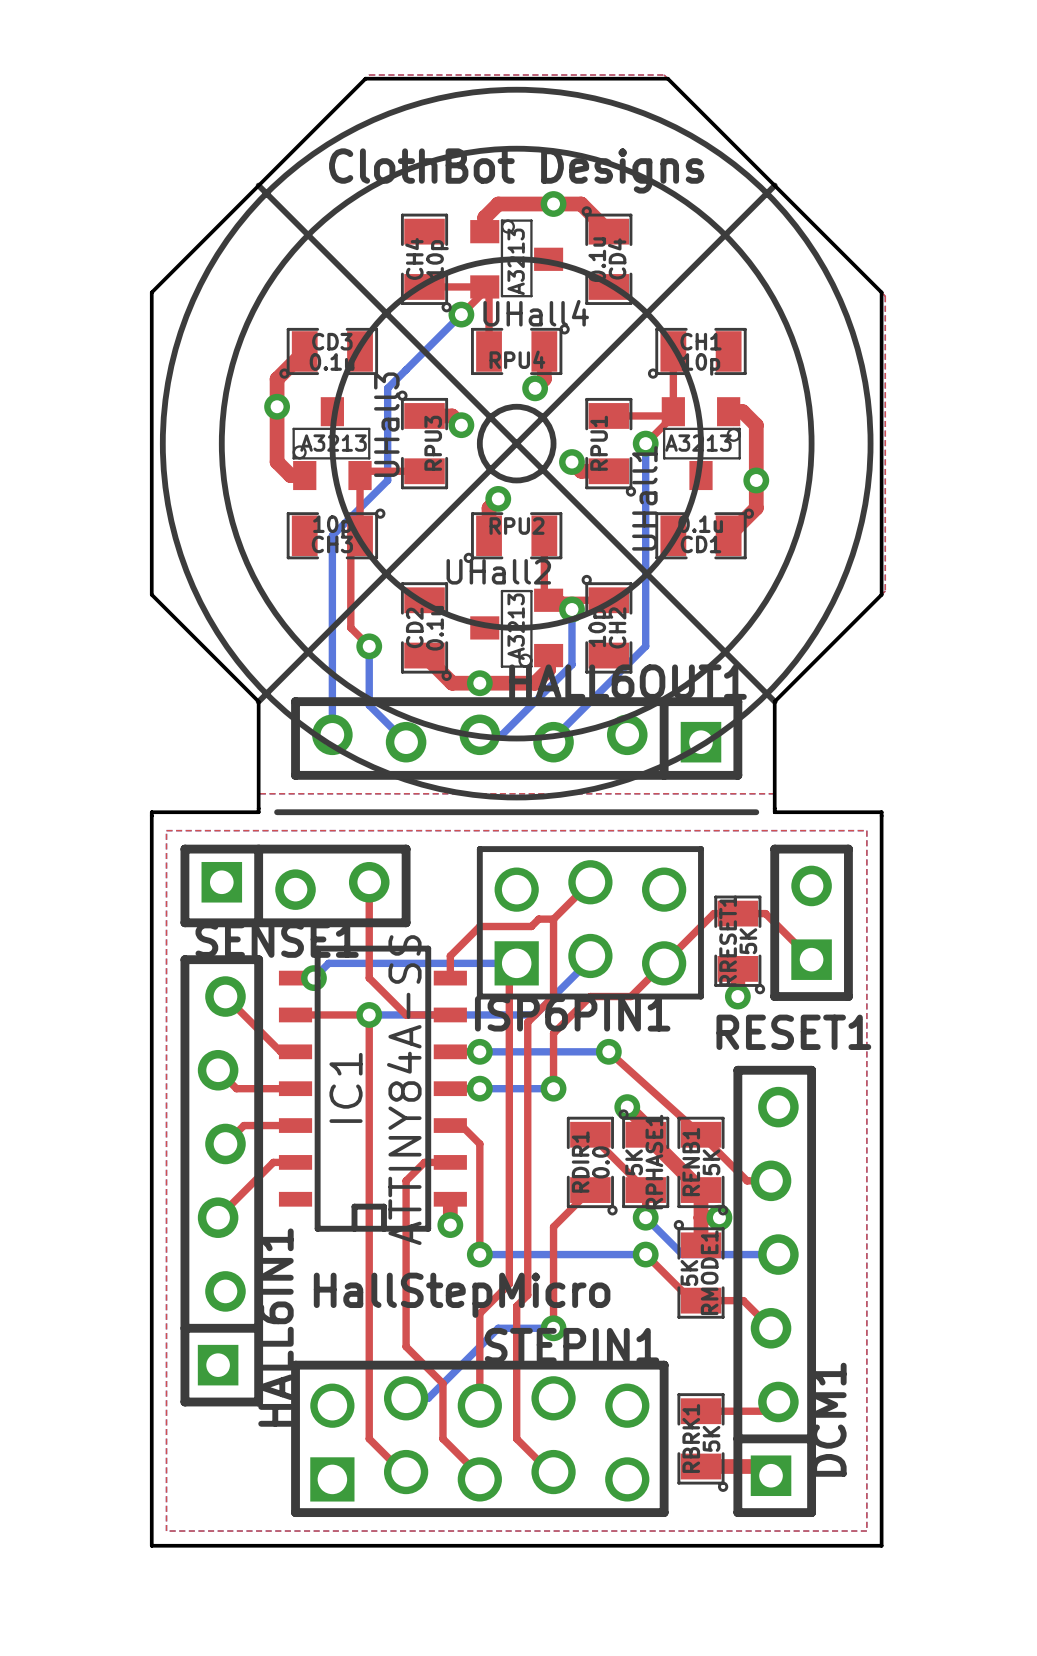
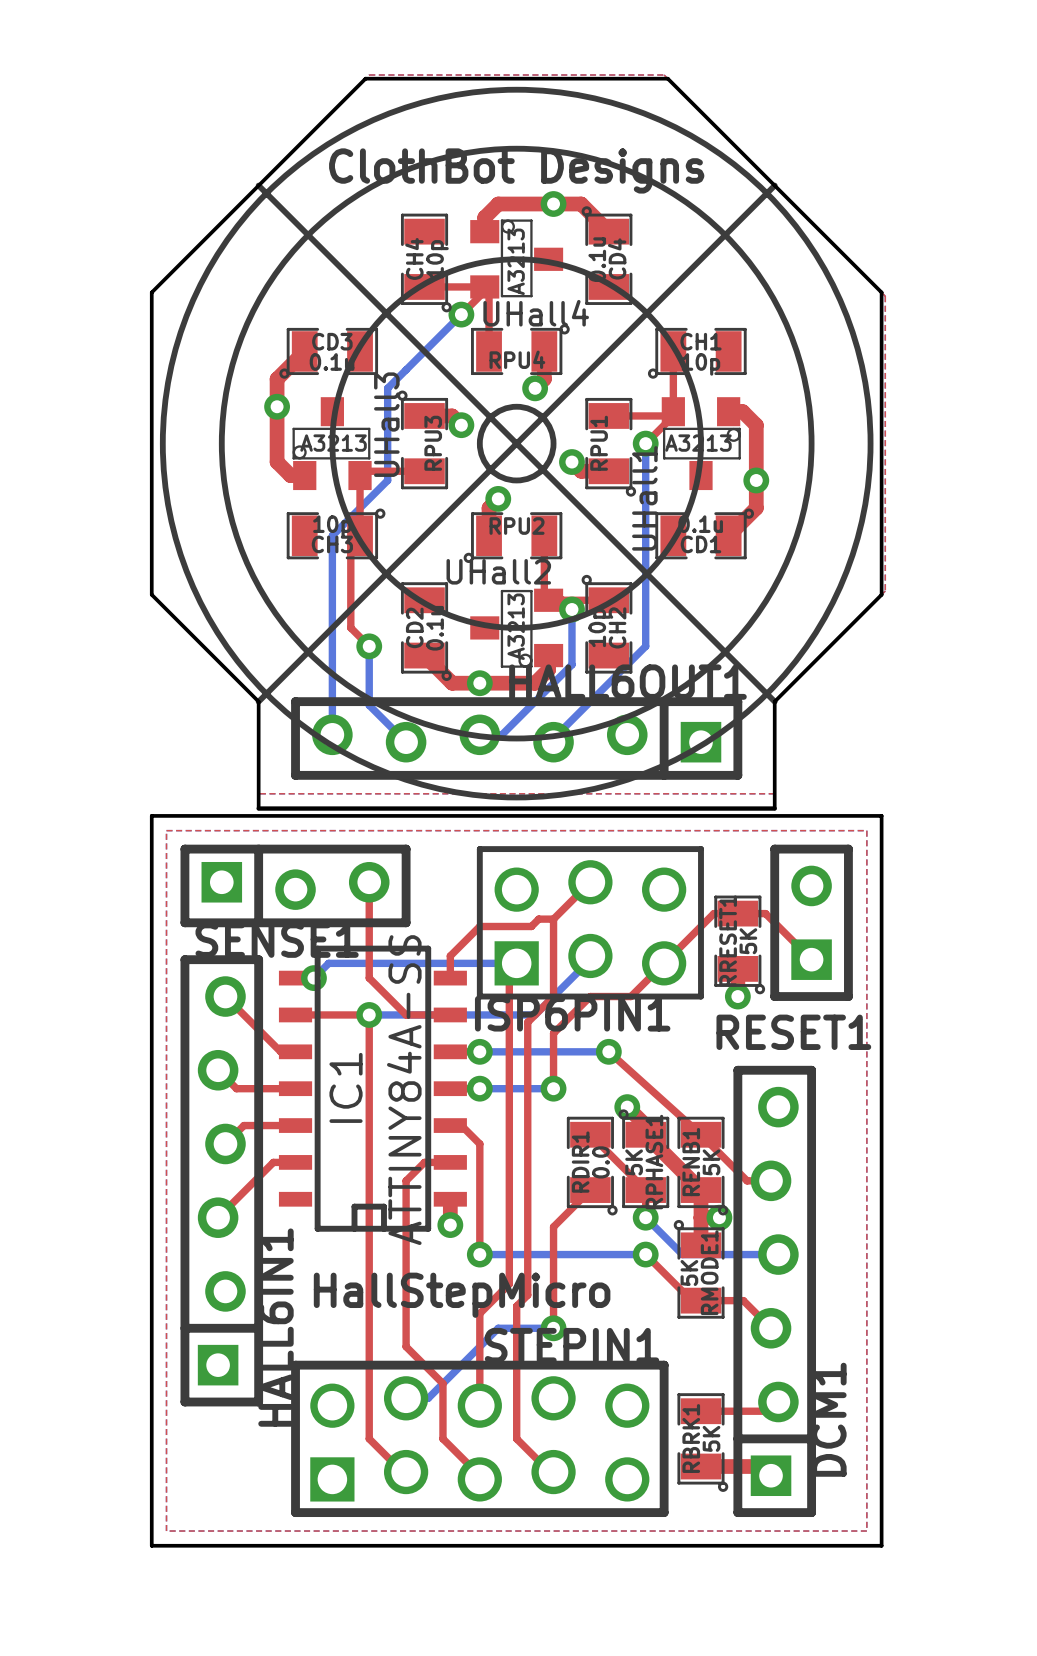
board edge: (258, 808) (258, 812) (151, 812) (151, 815) -> (258, 808) (774, 808)
board edge: (774, 808) (774, 812) (881, 812) (881, 815) -> (151, 815) (881, 815)
line: (277, 812) (756, 812) -> none

